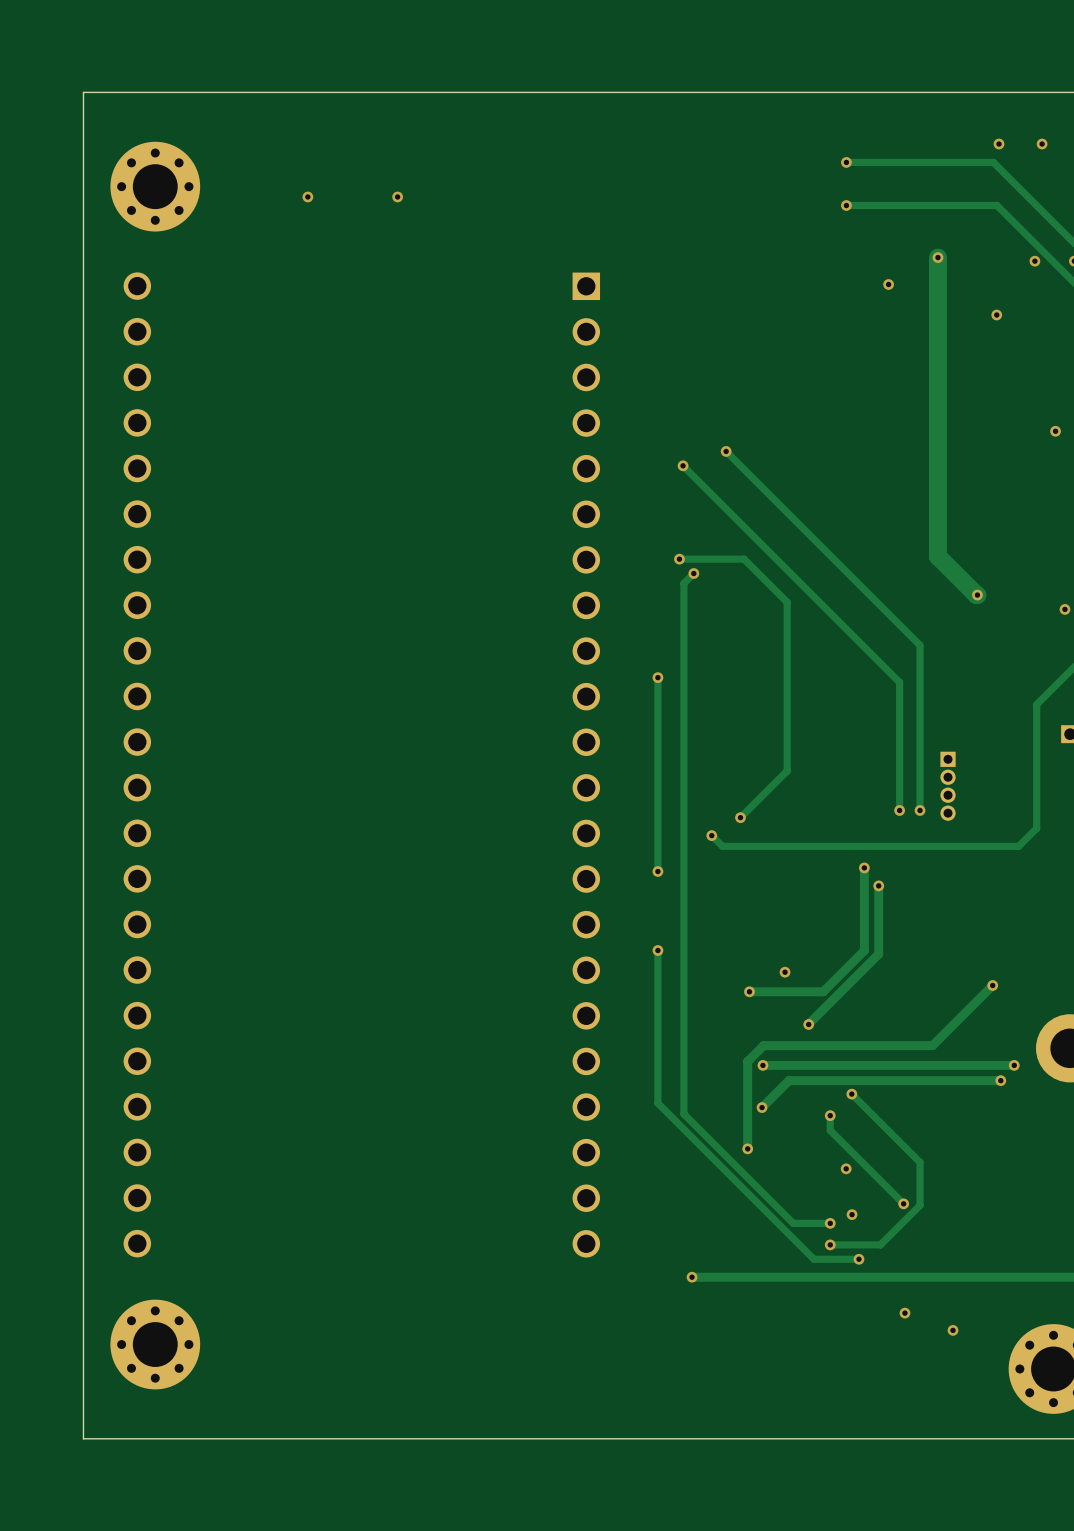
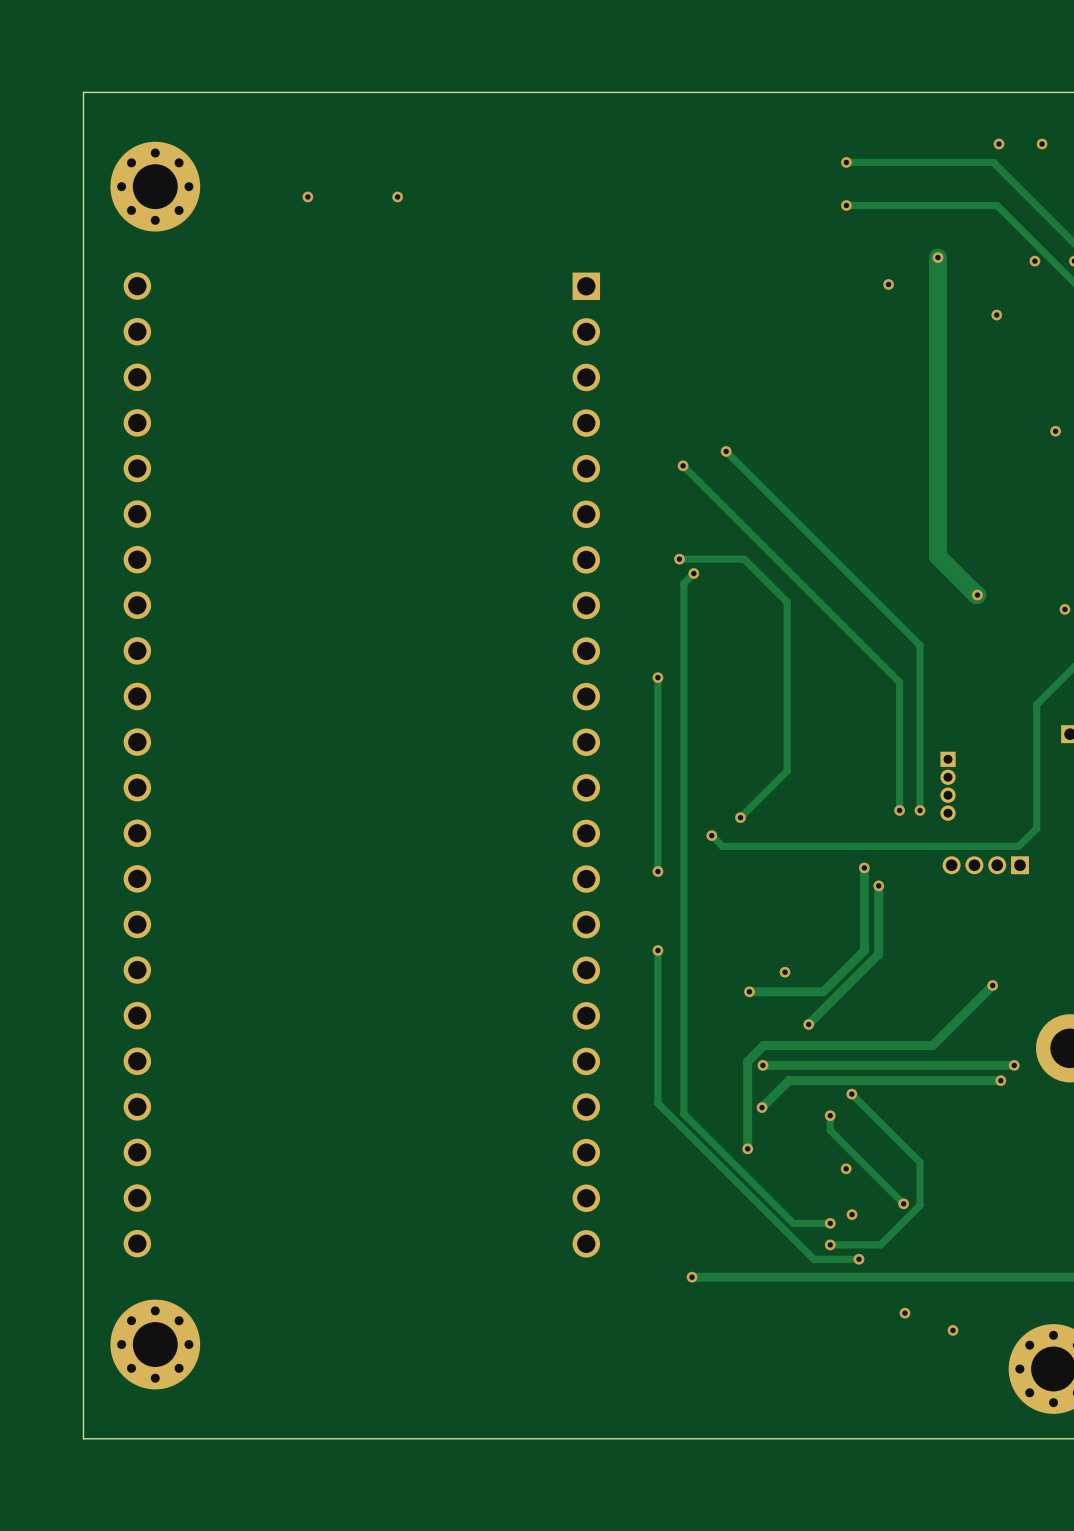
part: none -> (985, 865)

